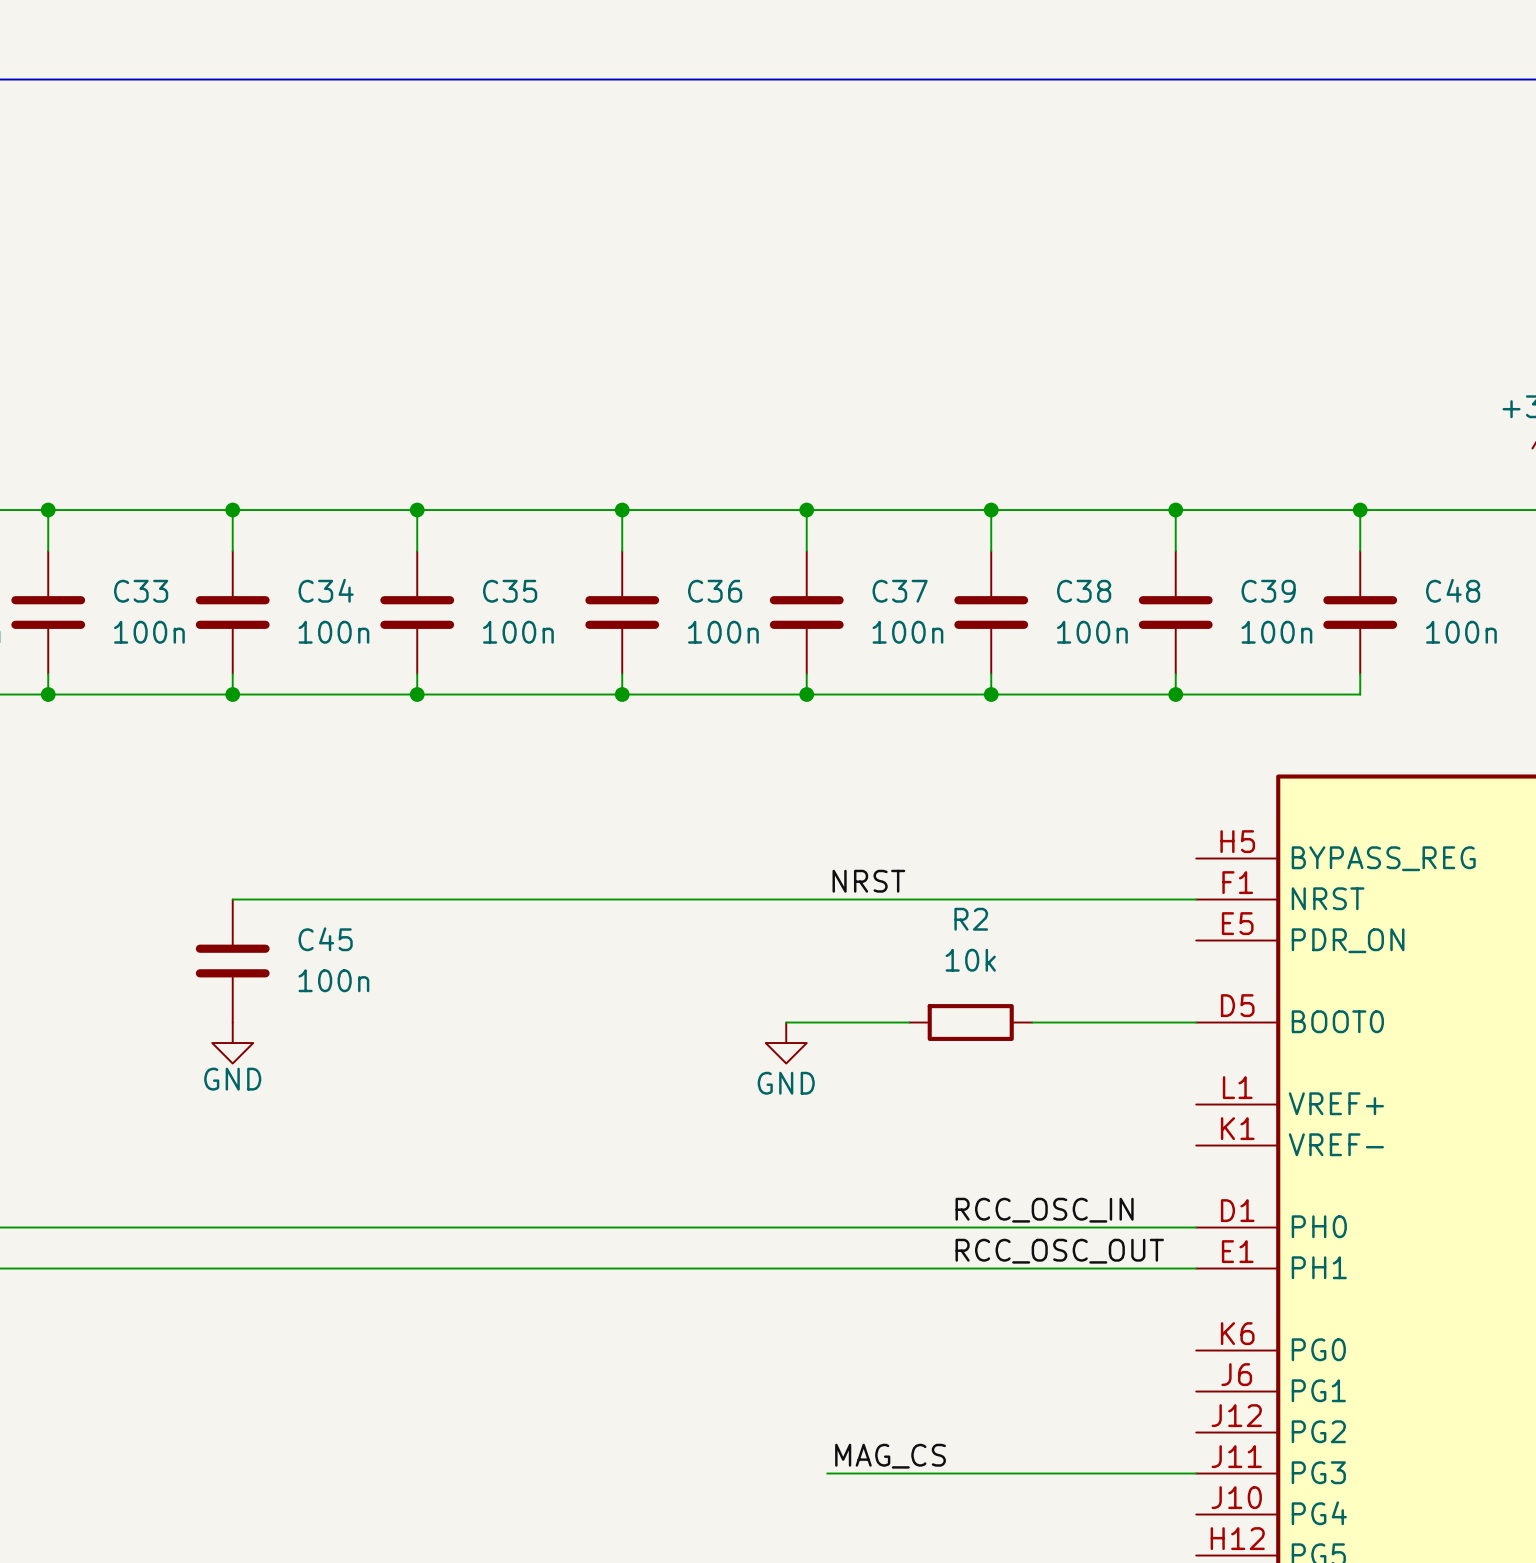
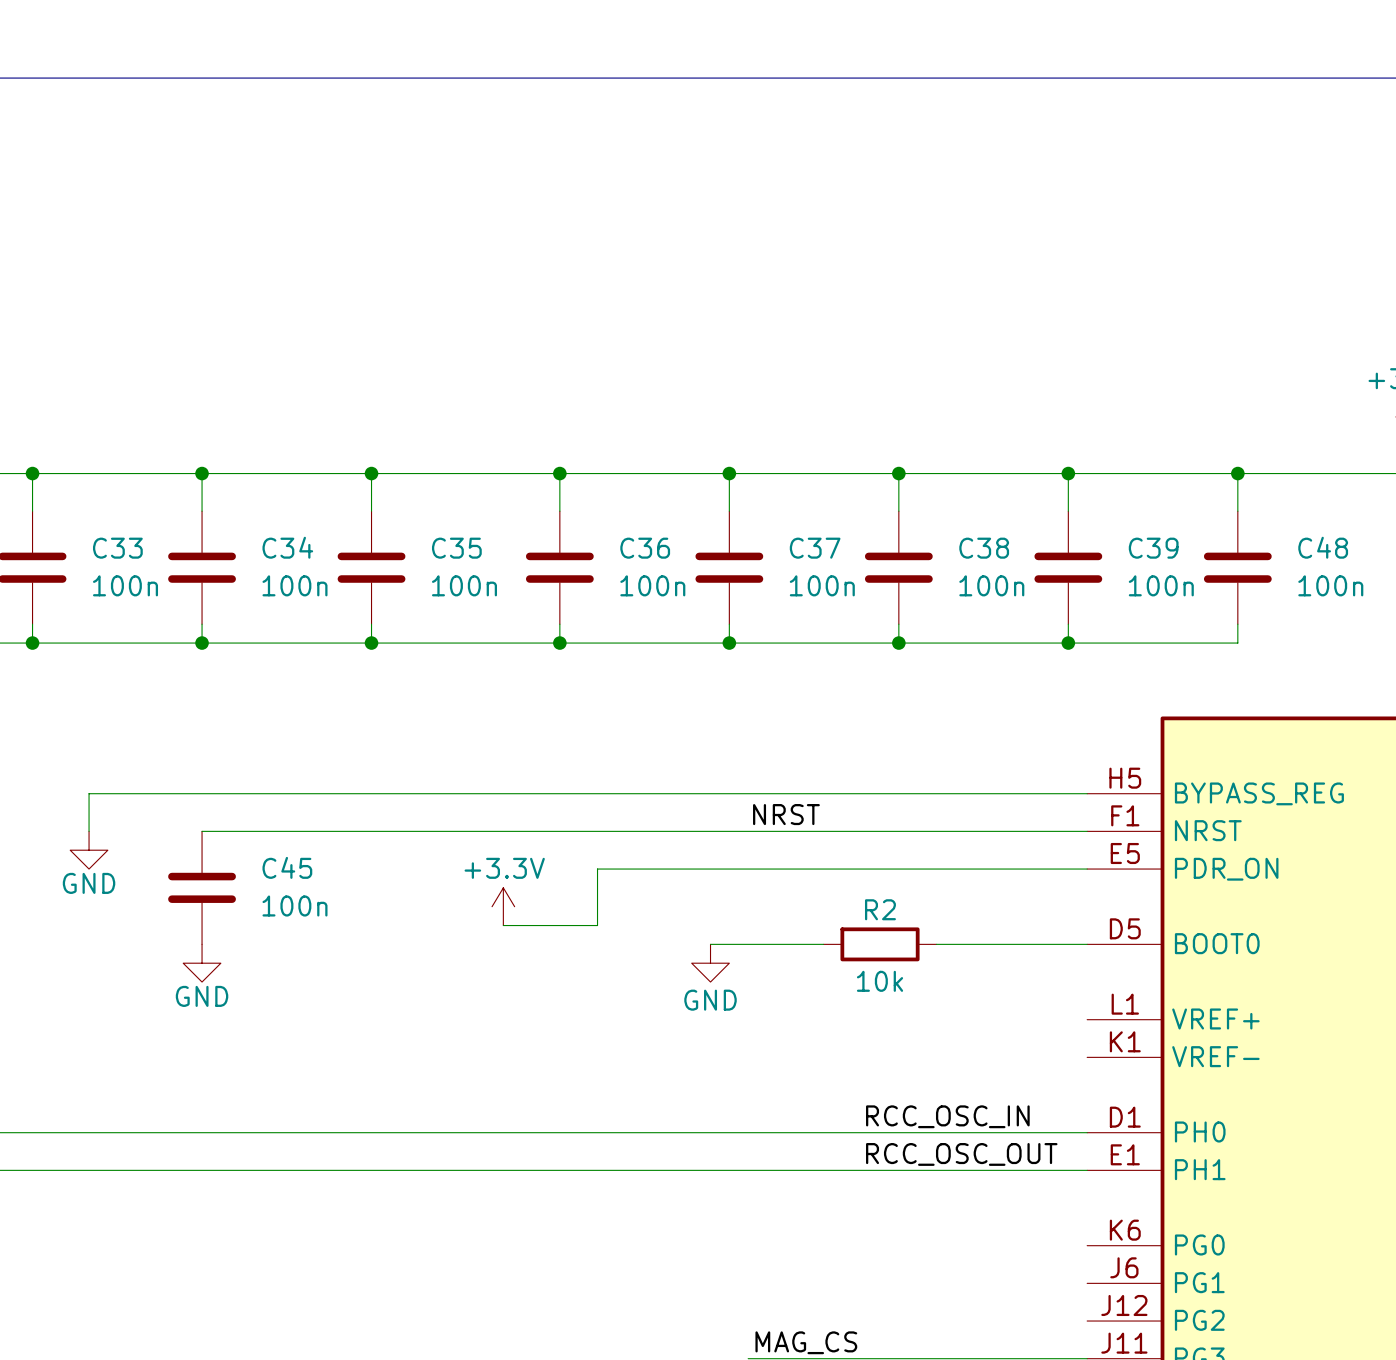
wire: none -> (1087, 793) (89, 793) (89, 831)
R2 name position: R2 (971, 919) -> R2 (880, 909)
power symbol: none -> GND (89, 850)
wire: none -> (1087, 869) (597, 869) (597, 925) (503, 925)
R2 value position: 10k (970, 960) -> 10k (880, 981)
power symbol: none -> +3.3V (503, 906)

